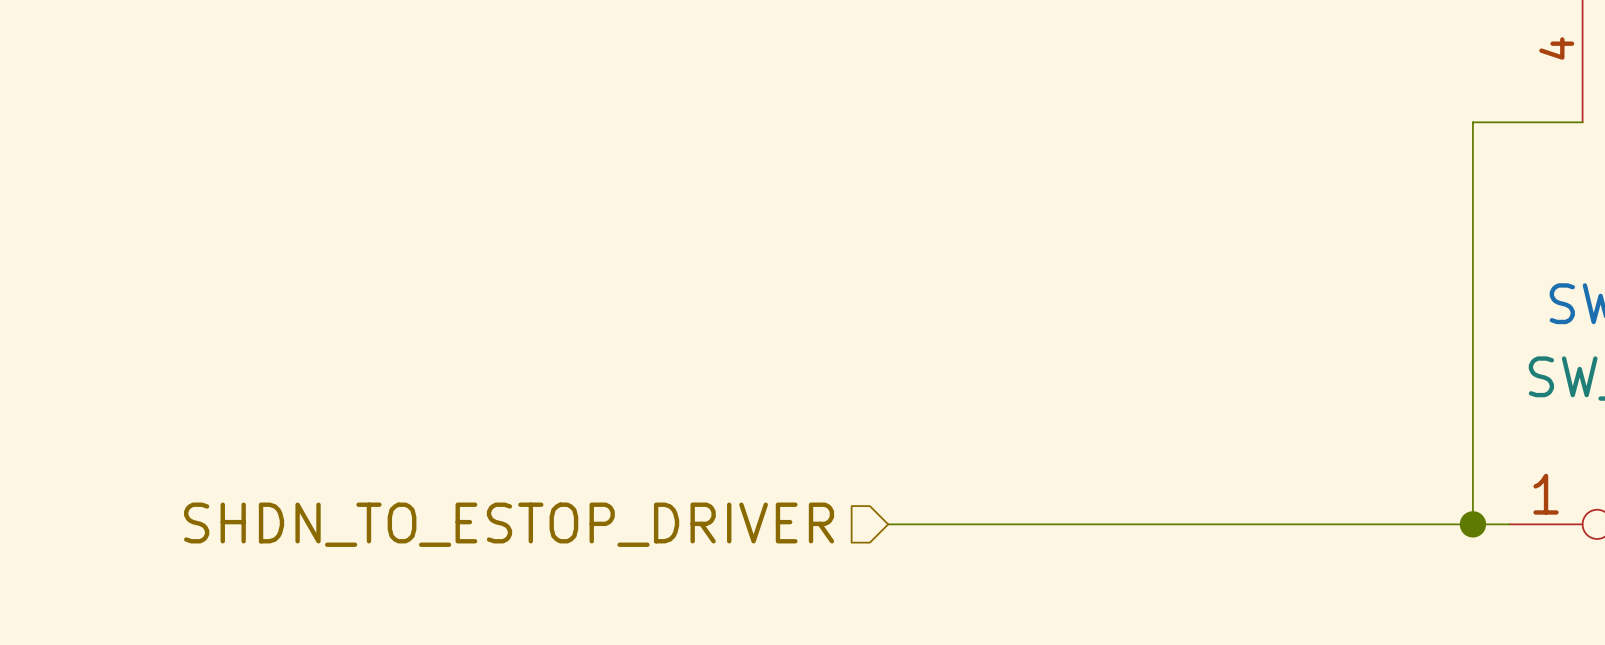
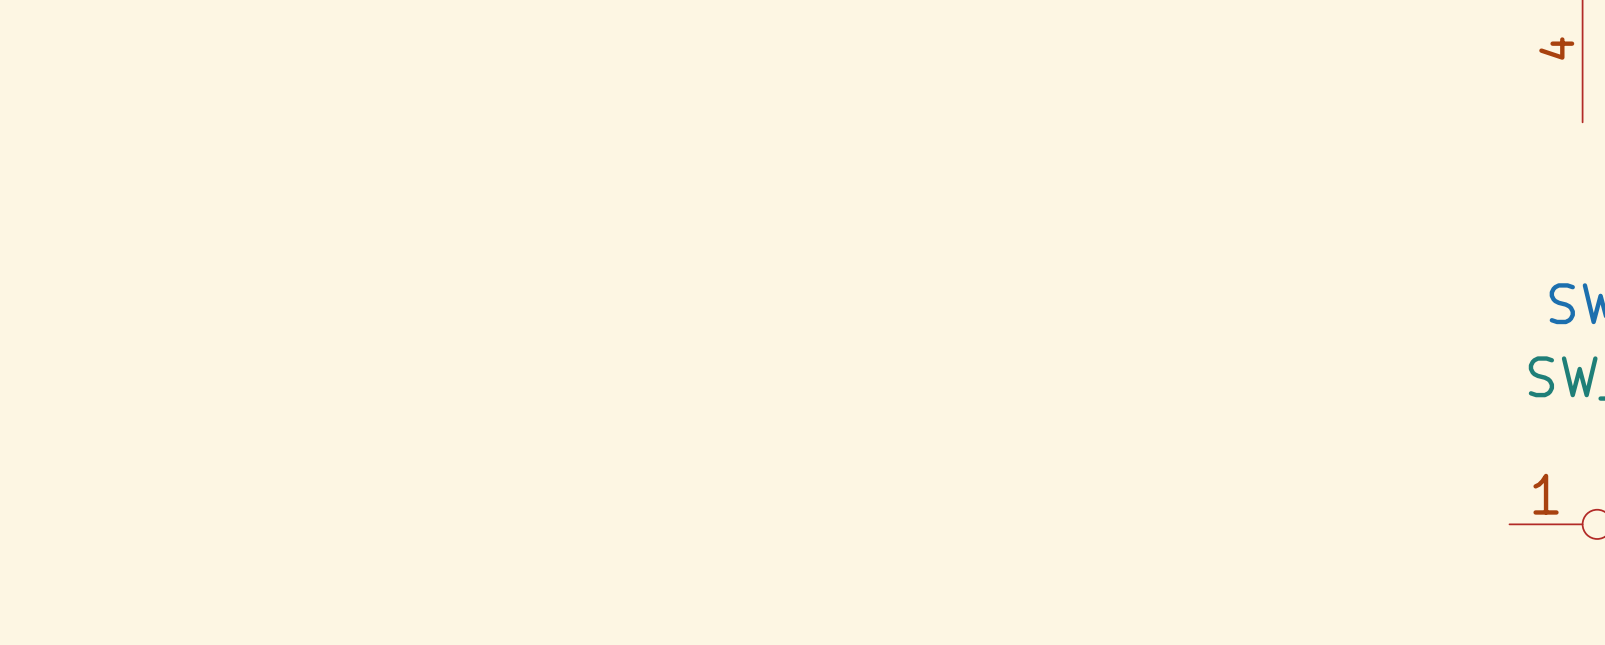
wire: (1582, 122) (1472, 122) (1472, 524) -> none
hierarchical label: SHDN_TO_ESTOP_DRIVER (509, 524) -> none
wire: (888, 524) (1509, 524) -> none
junction: (1472, 524) -> none

